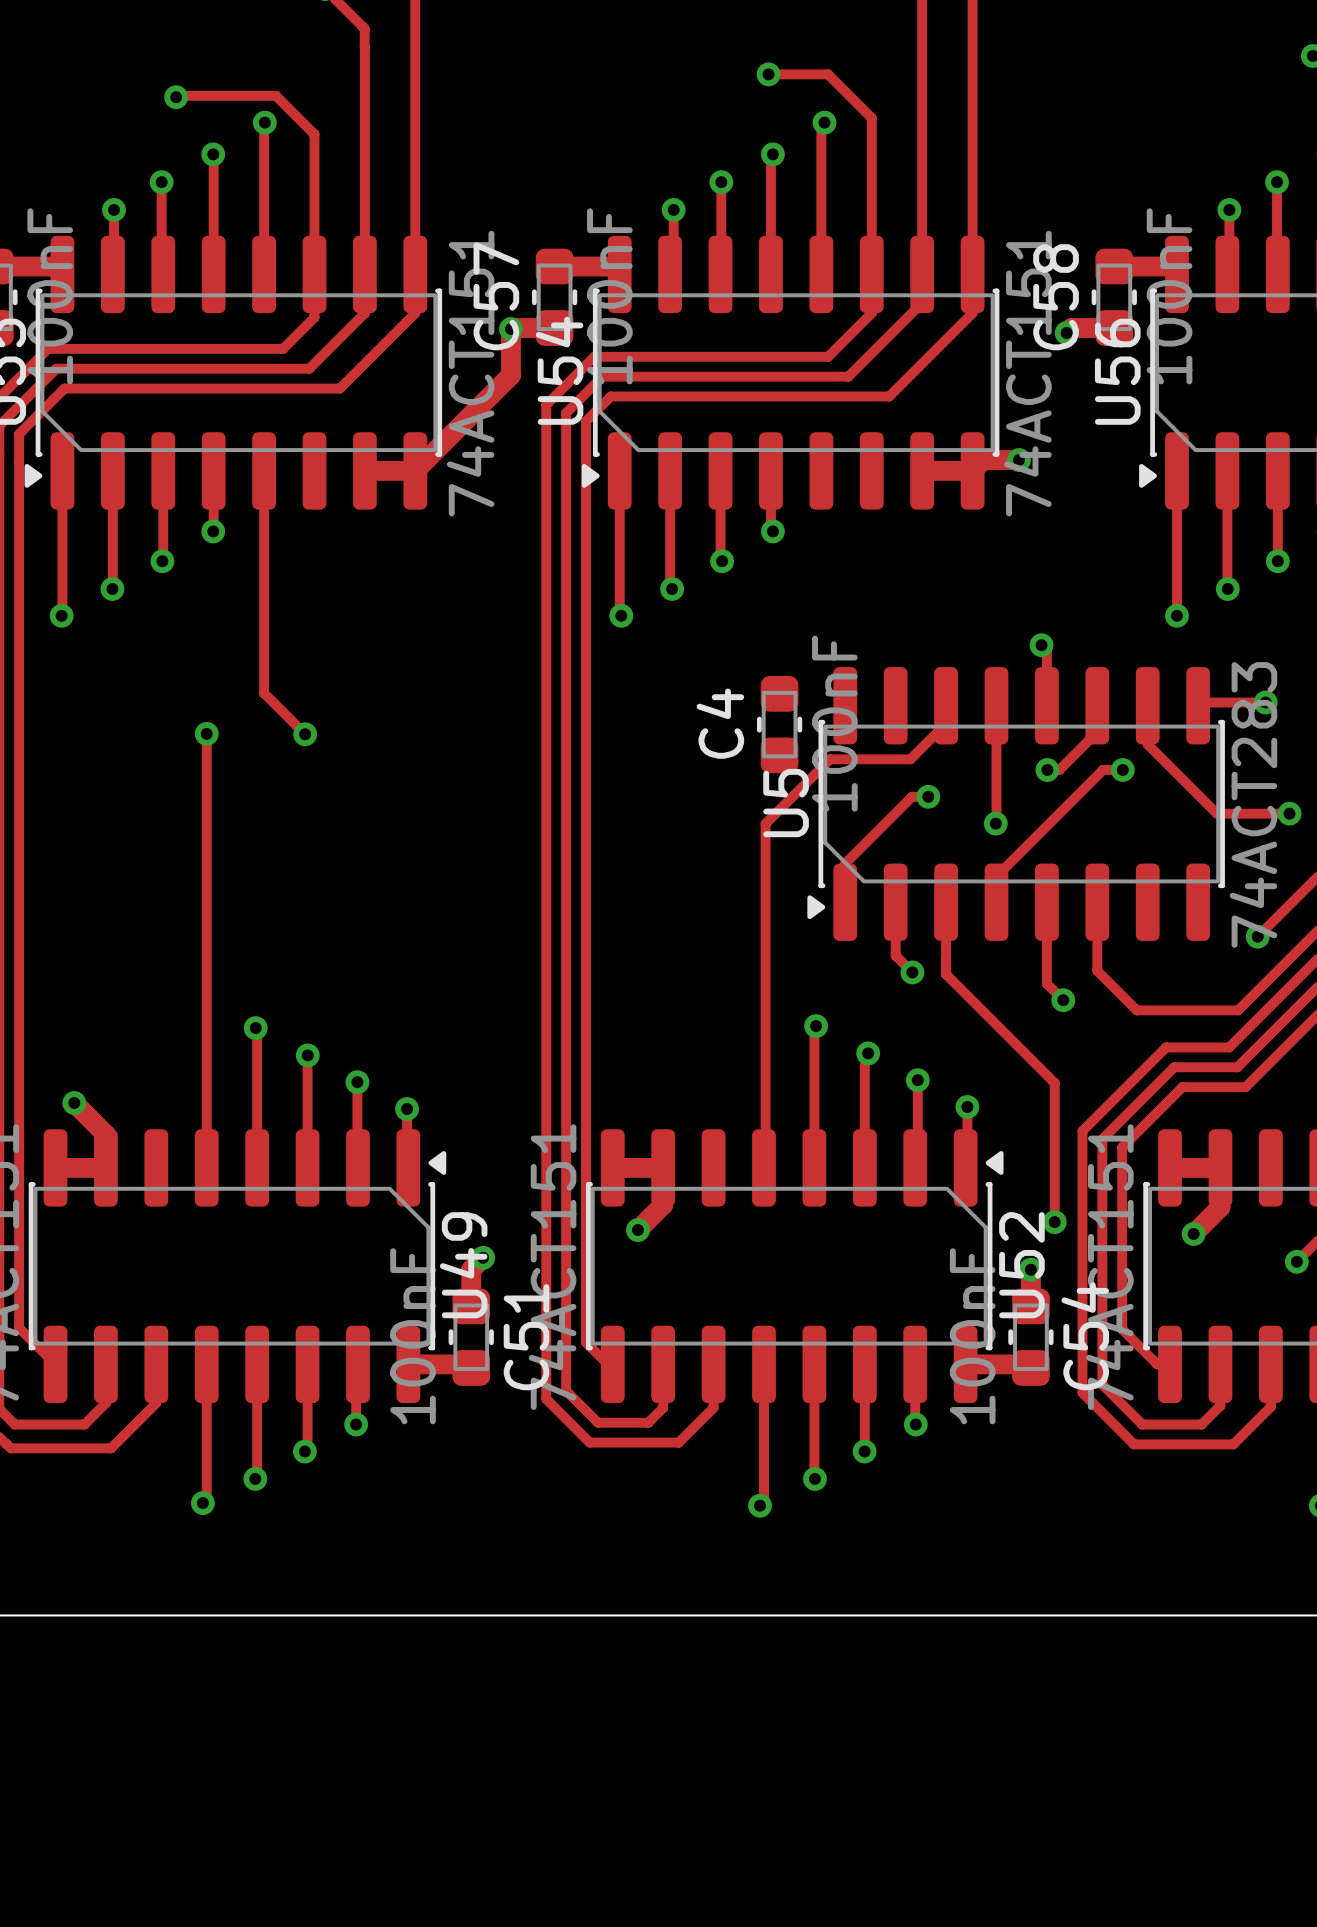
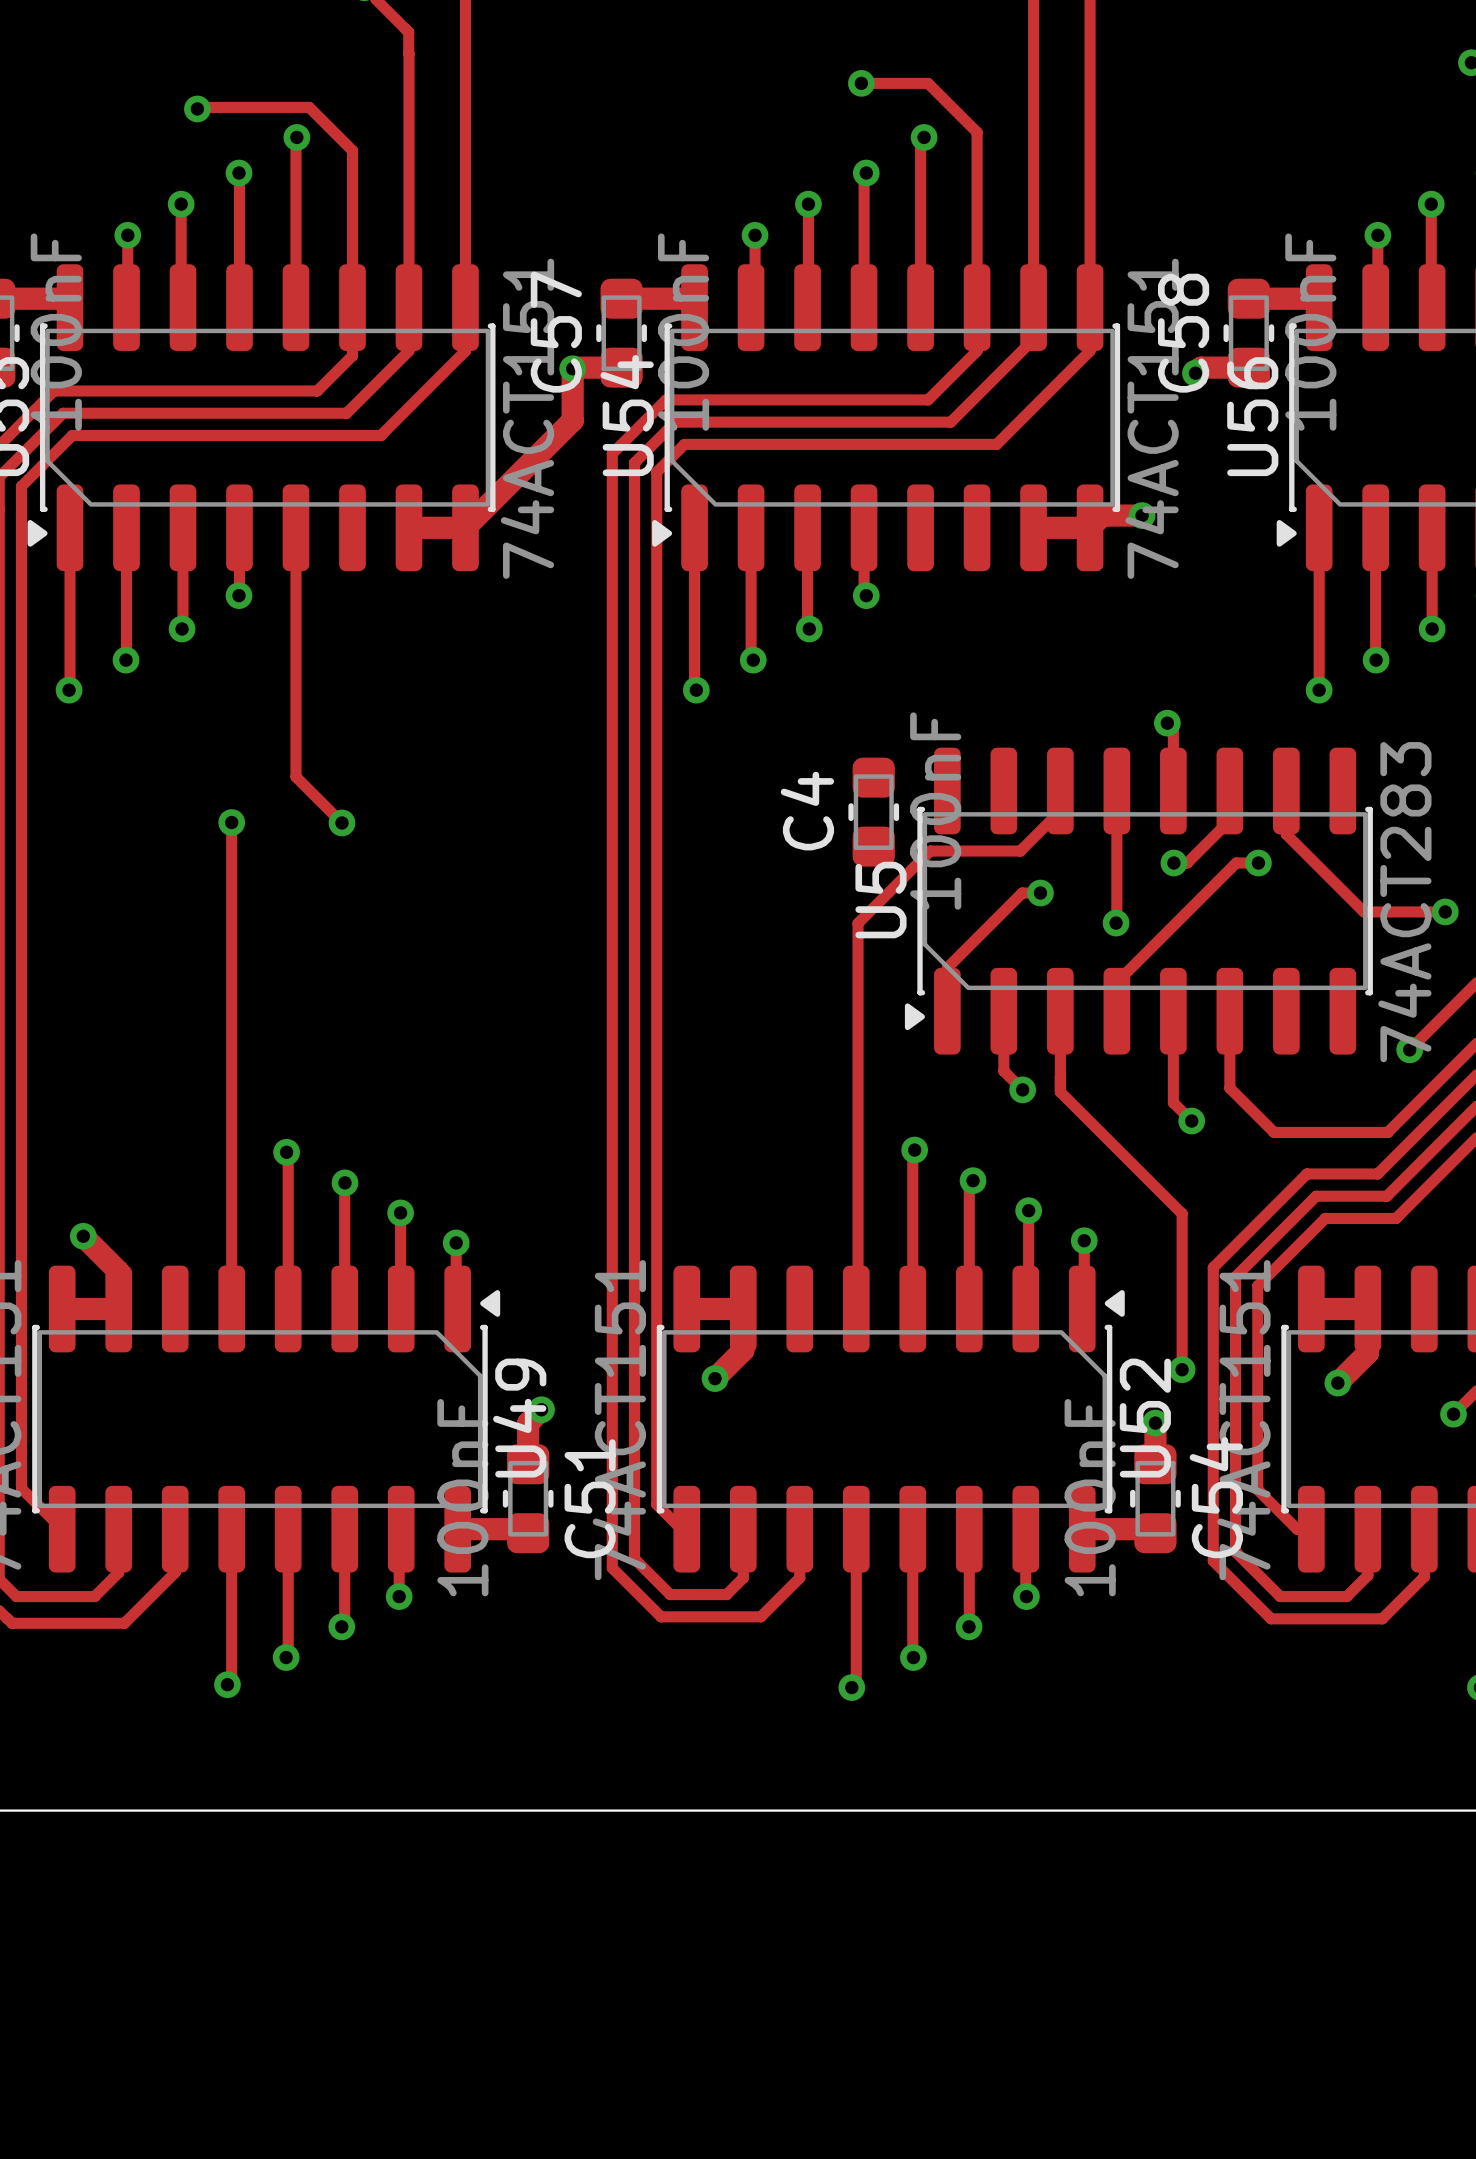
track: (1265, 702) (1201, 702) (1198, 705) -> none
via: (1265, 702) -> none

